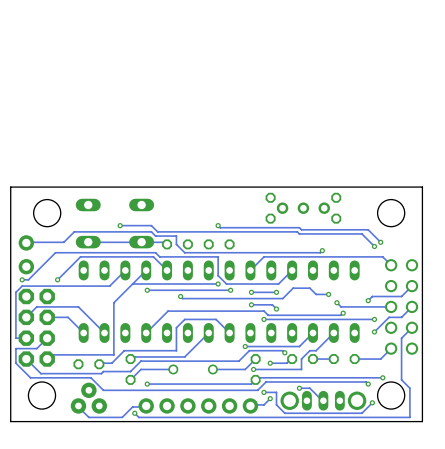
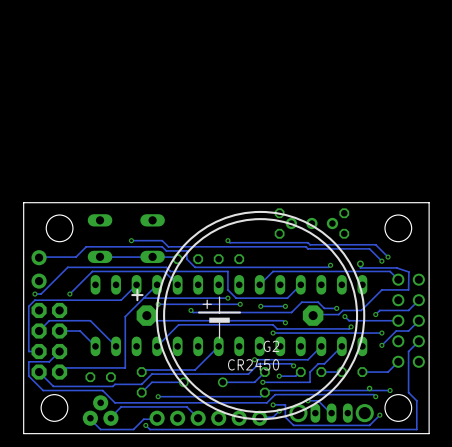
track: none -> (360, 263) (360, 267) (396, 267) (408, 271) (408, 289) (381, 289) (361, 310) (342, 310) (338, 314) (313, 315)
via: none -> (360, 263)
G2: none -> (248, 315)
track: (251, 304) (272, 304) (274, 306) -> (146, 315) (151, 320) (283, 320)
via: (251, 304) -> none
track: (229, 332) (216, 319) (184, 319) (176, 327) (176, 350) (124, 350) (111, 363) (99, 364) -> none
via: none -> (369, 388)
track: none -> (198, 418) (186, 406) (121, 406) (110, 418)

